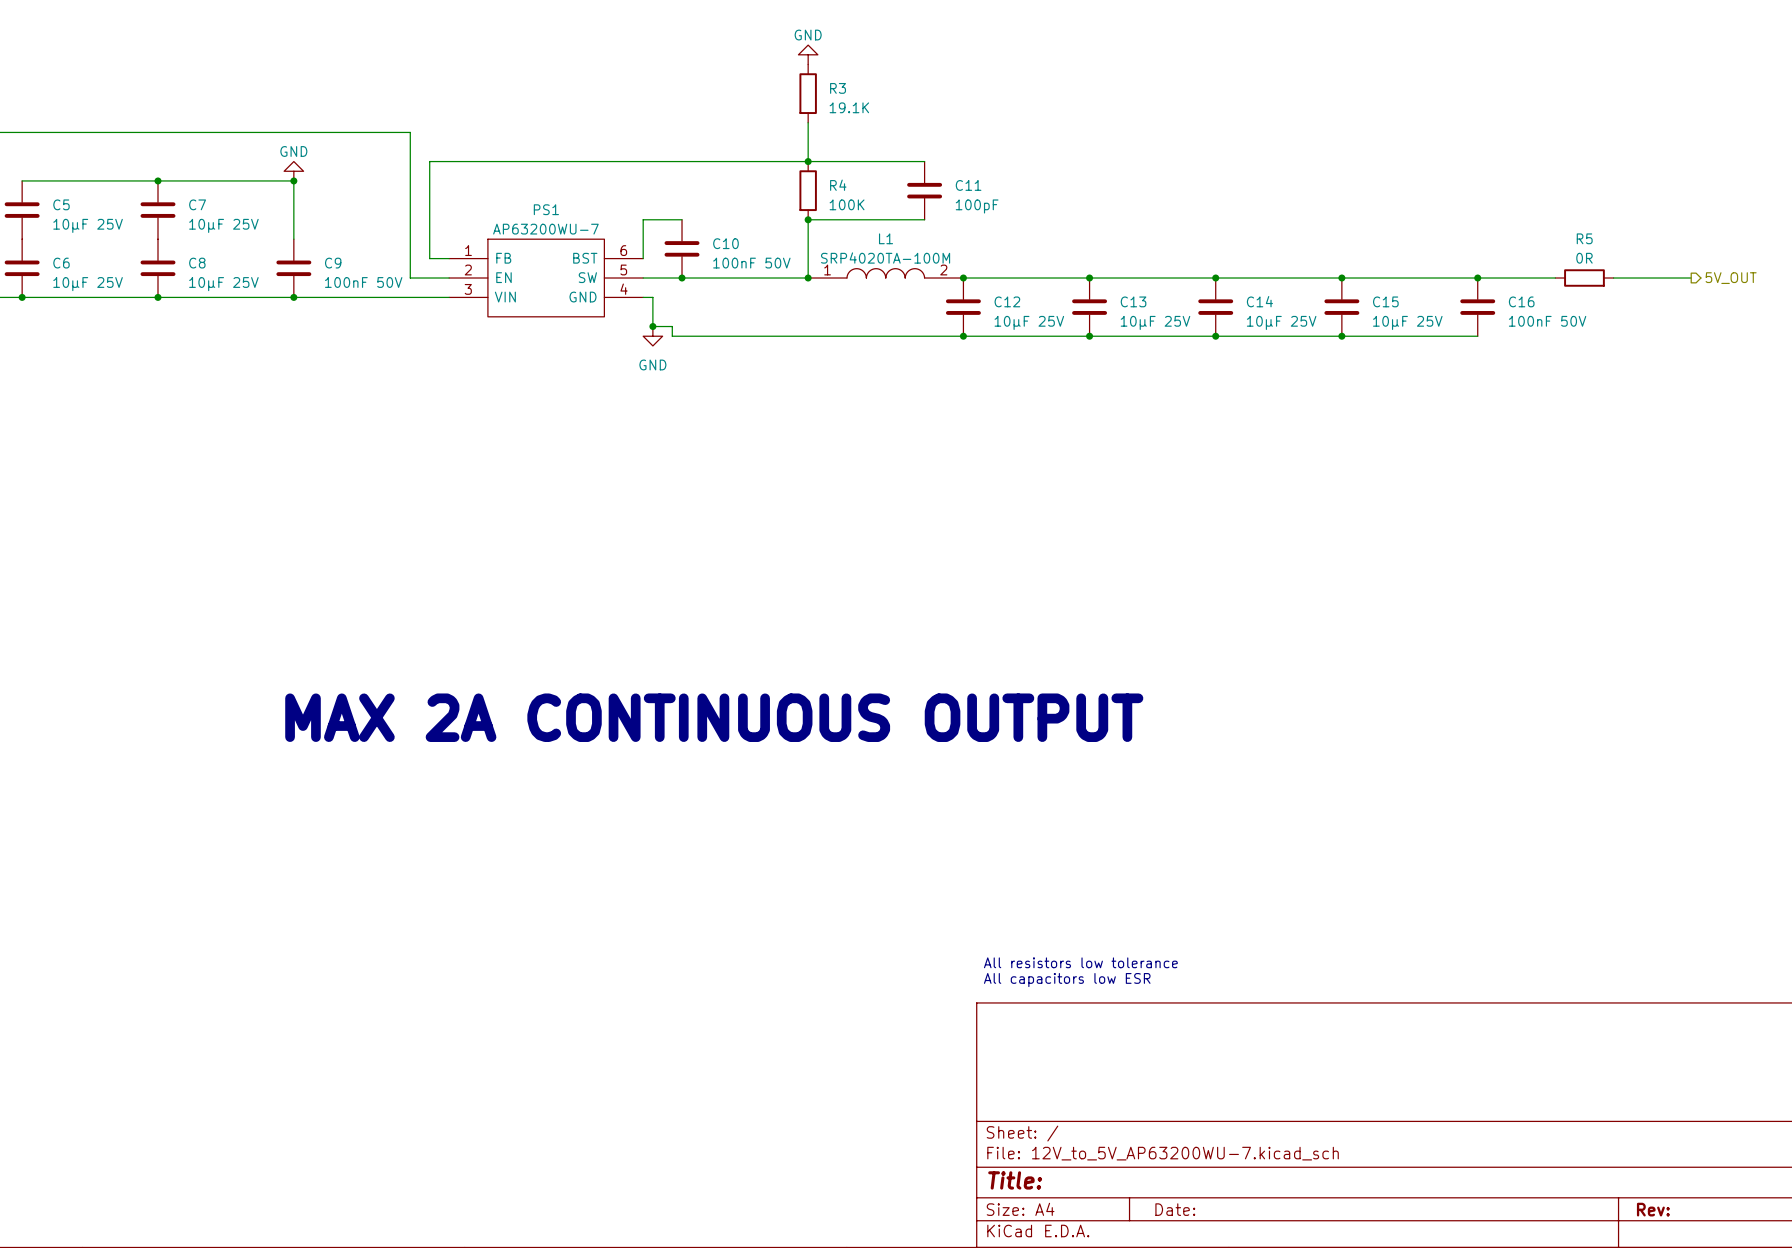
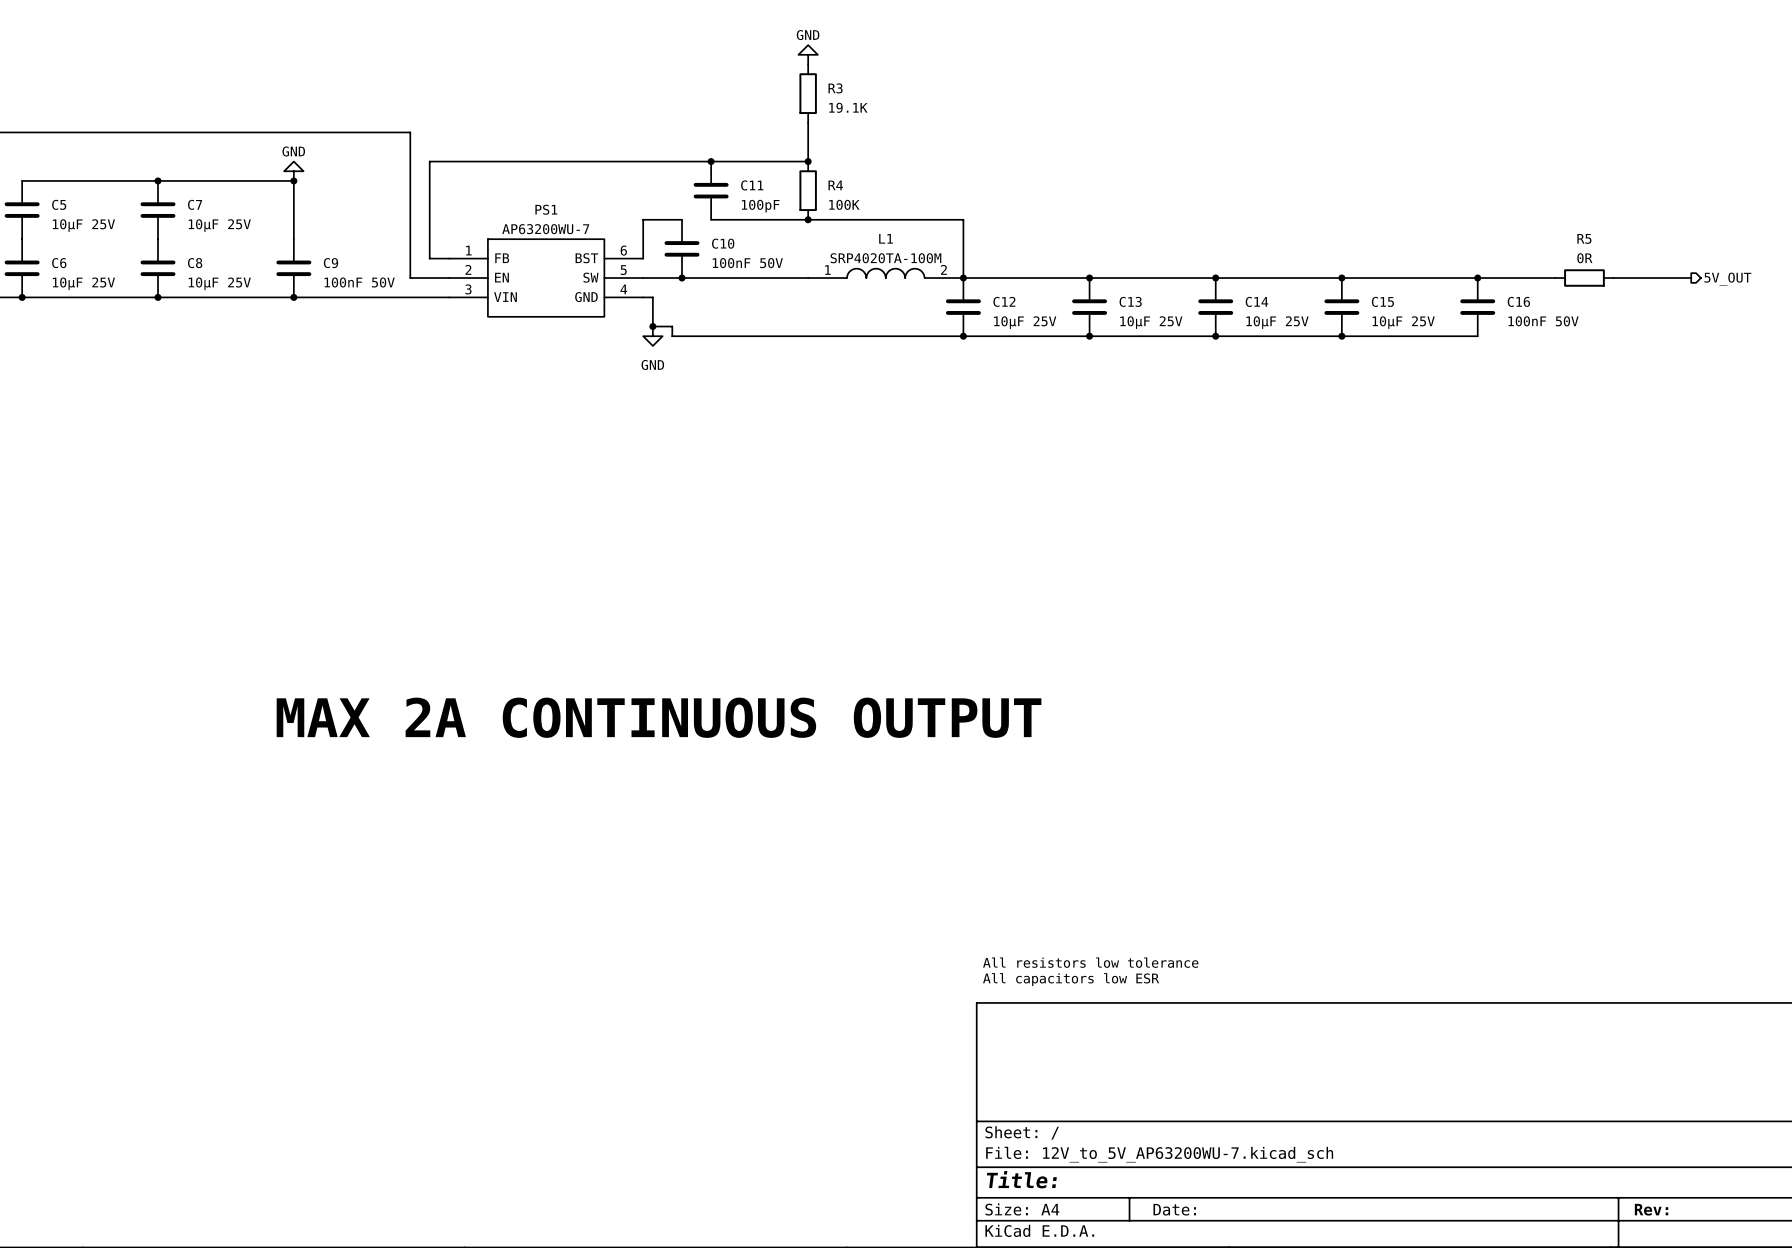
junction: none -> (711, 161)
wire: (808, 161) (924, 161) -> none
C11 position: (924, 190) -> (711, 190)
wire: (808, 219) (808, 278) -> (808, 219) (711, 219)
wire: none -> (924, 219) (963, 219) (963, 278)
junction: (808, 278) -> none

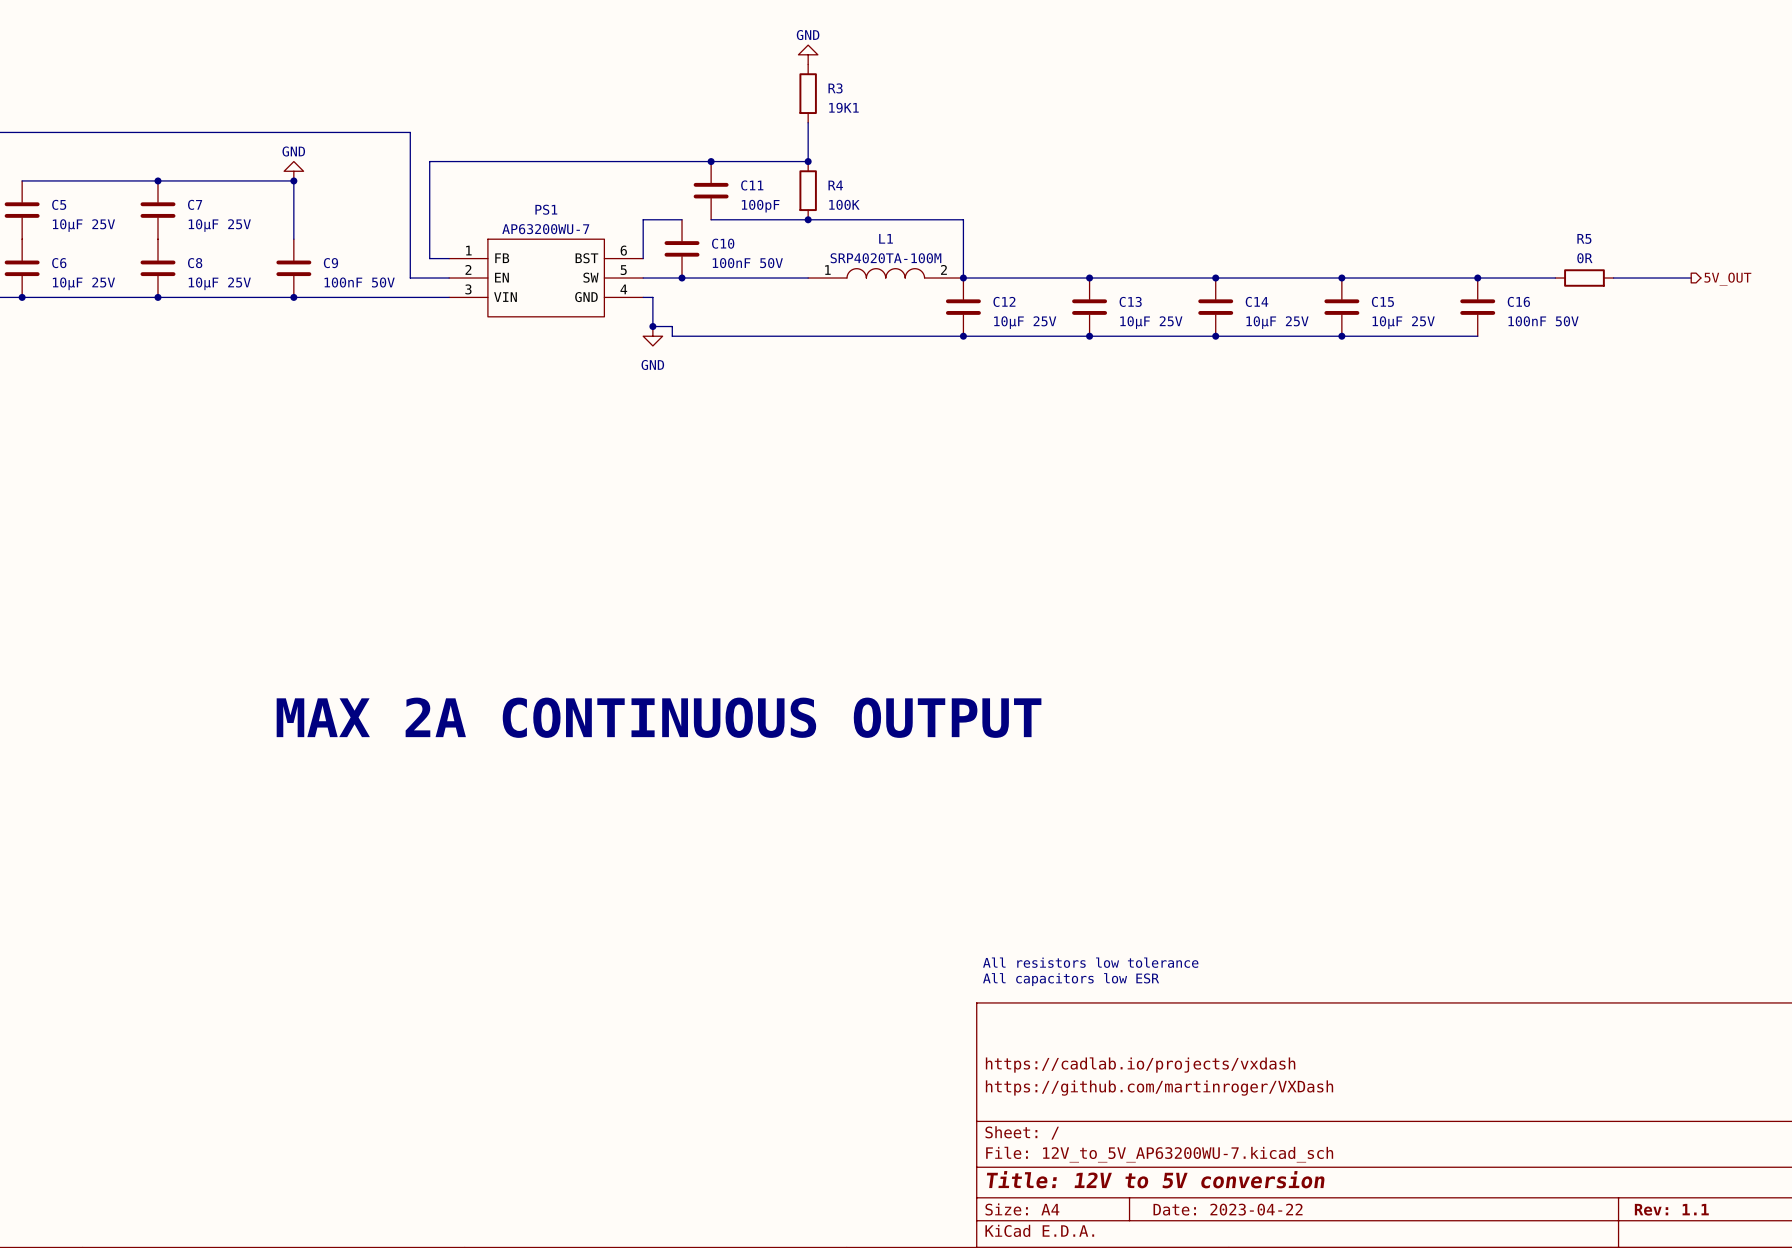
R3 value: 19.1K (848, 107) -> 19K1 (843, 107)
title block: none -> https://cadlab.io/projects/vxdash (1140, 1065)
title block: none -> https://github.com/martinroger/VXDash (1159, 1088)
title block: Title: (1021, 1179) -> Title: 12V to 5V conversion (1155, 1179)
title block: Date: (1174, 1209) -> Date: 2023-04-22 (1228, 1209)
title block: Rev: (1651, 1209) -> Rev: 1.1 (1671, 1209)

